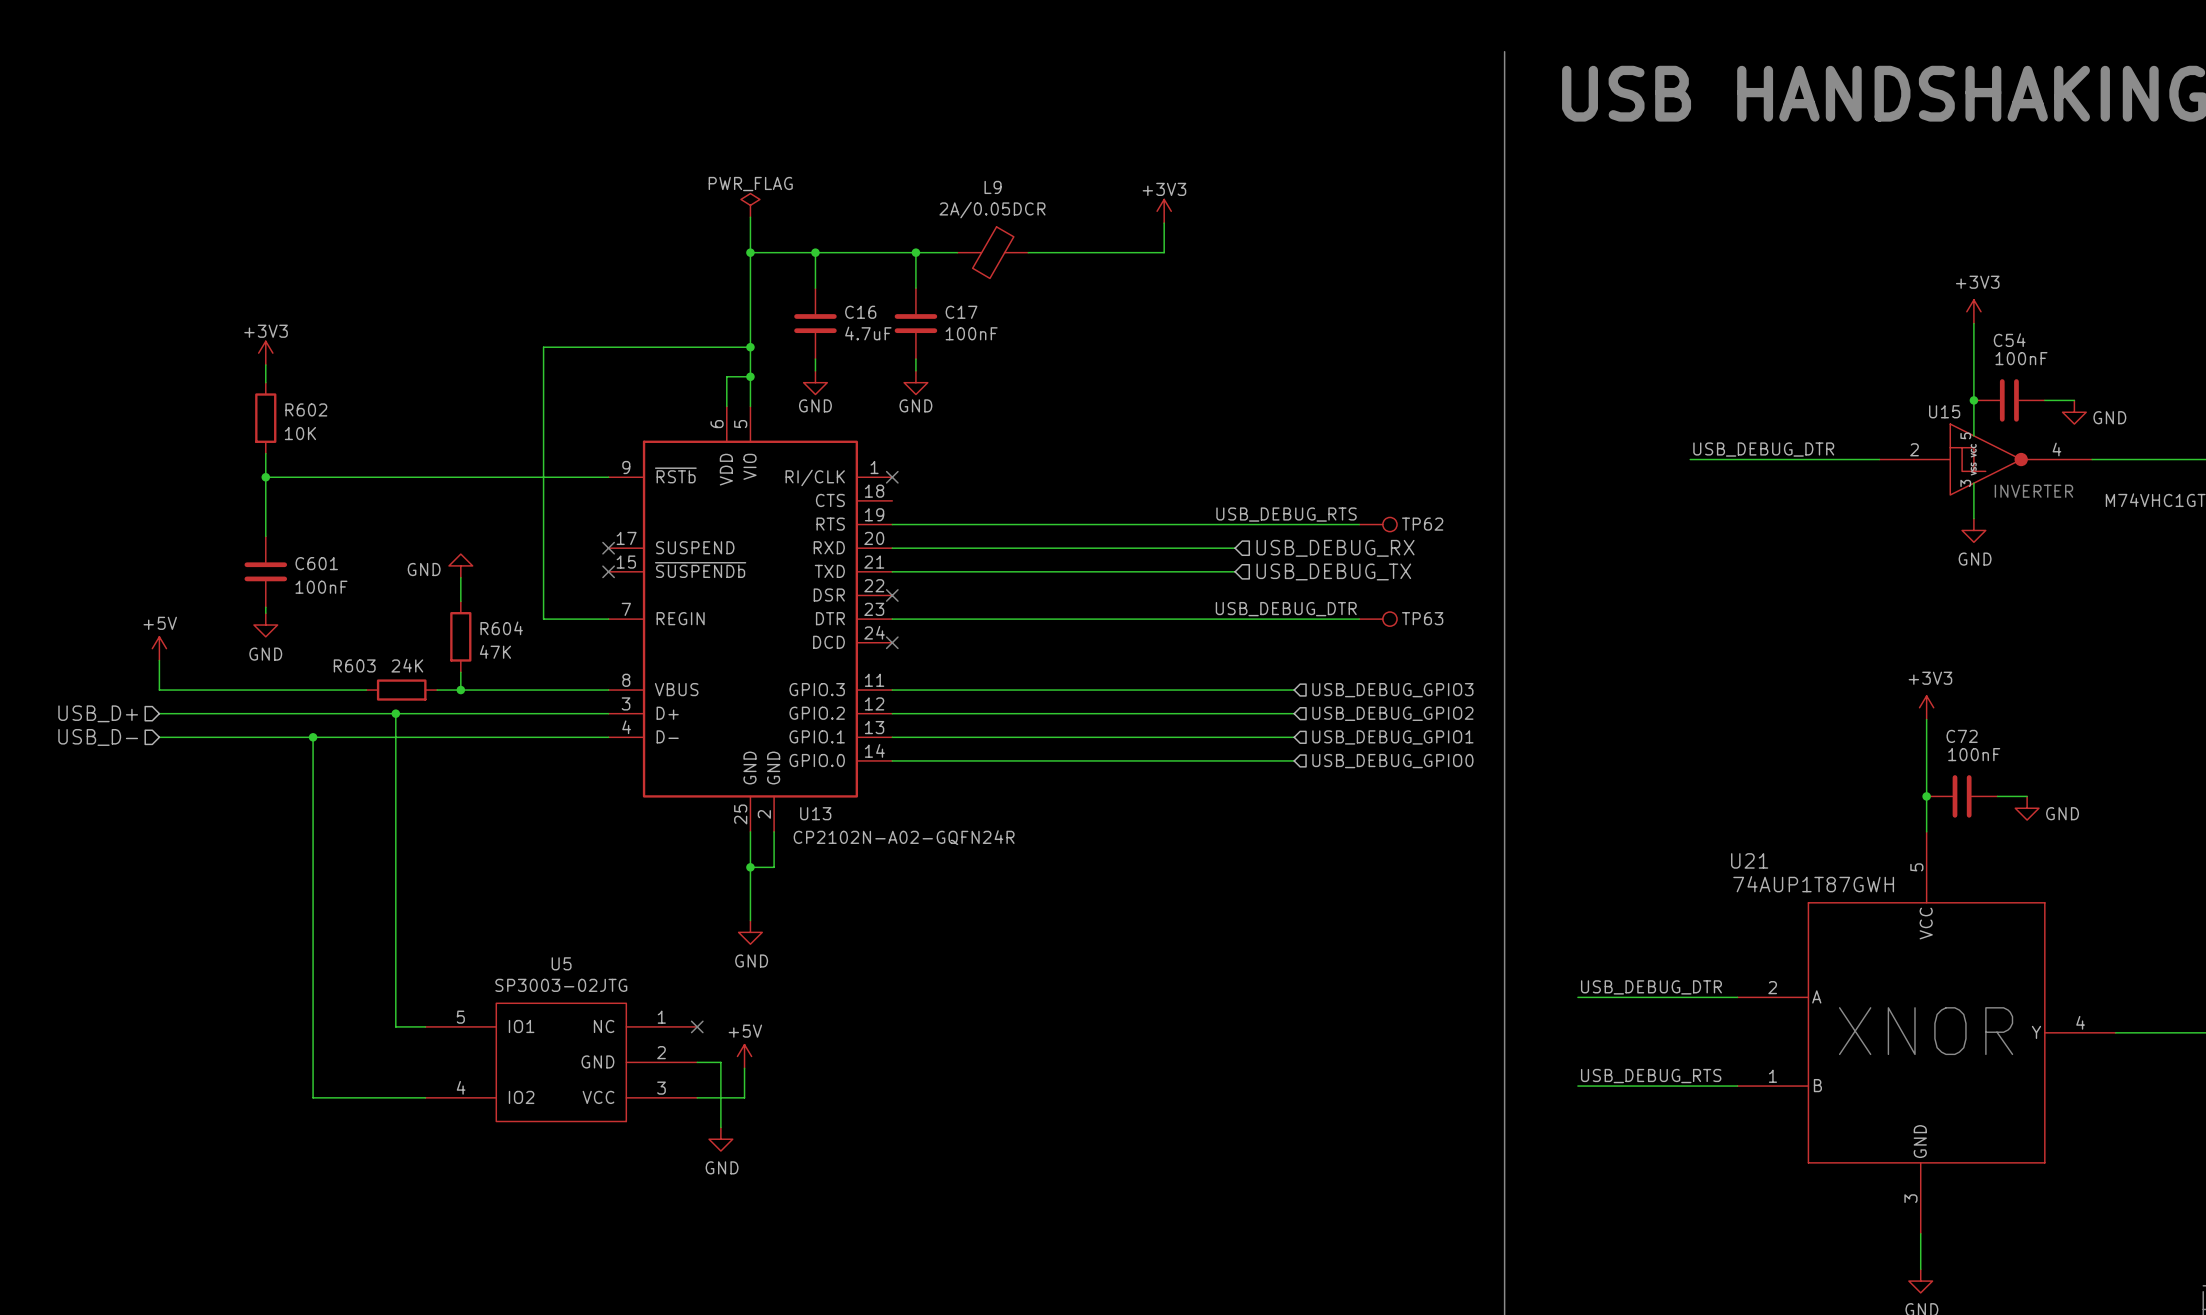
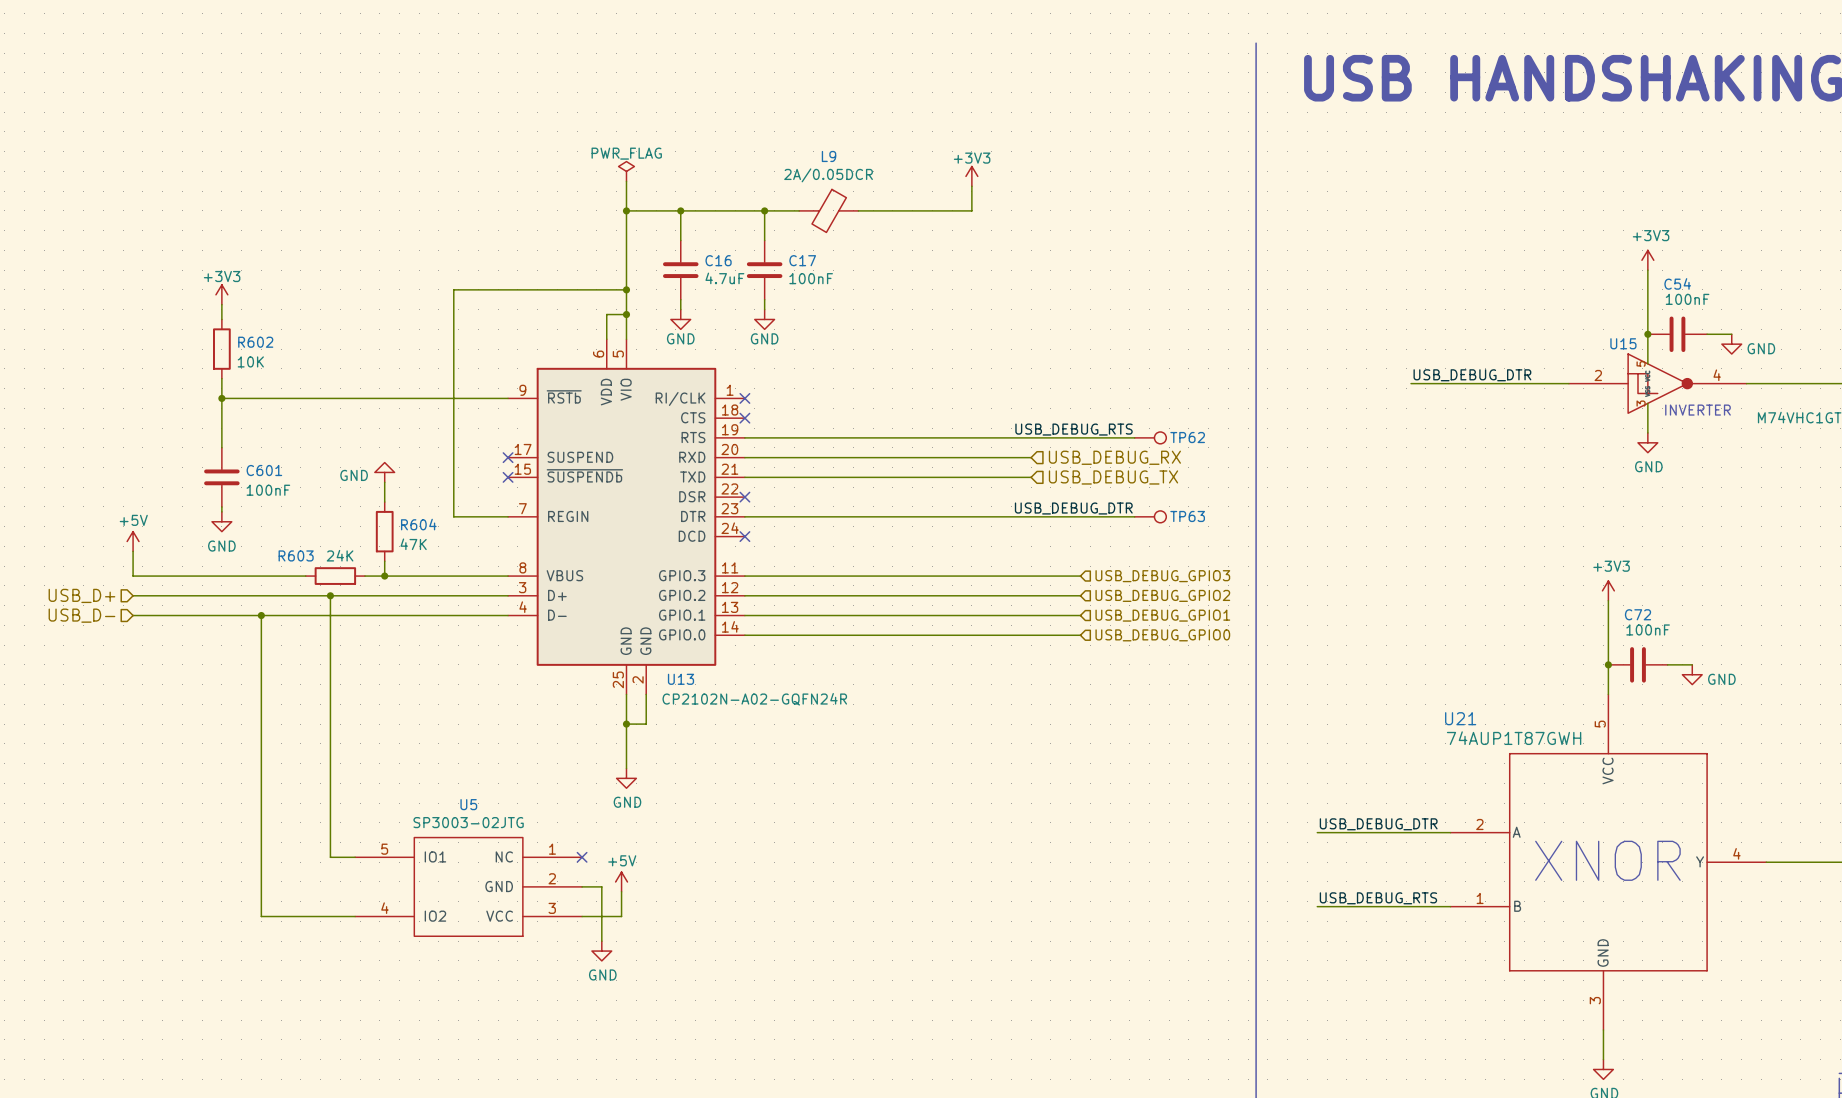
no-connect mark: none -> (744, 418)

